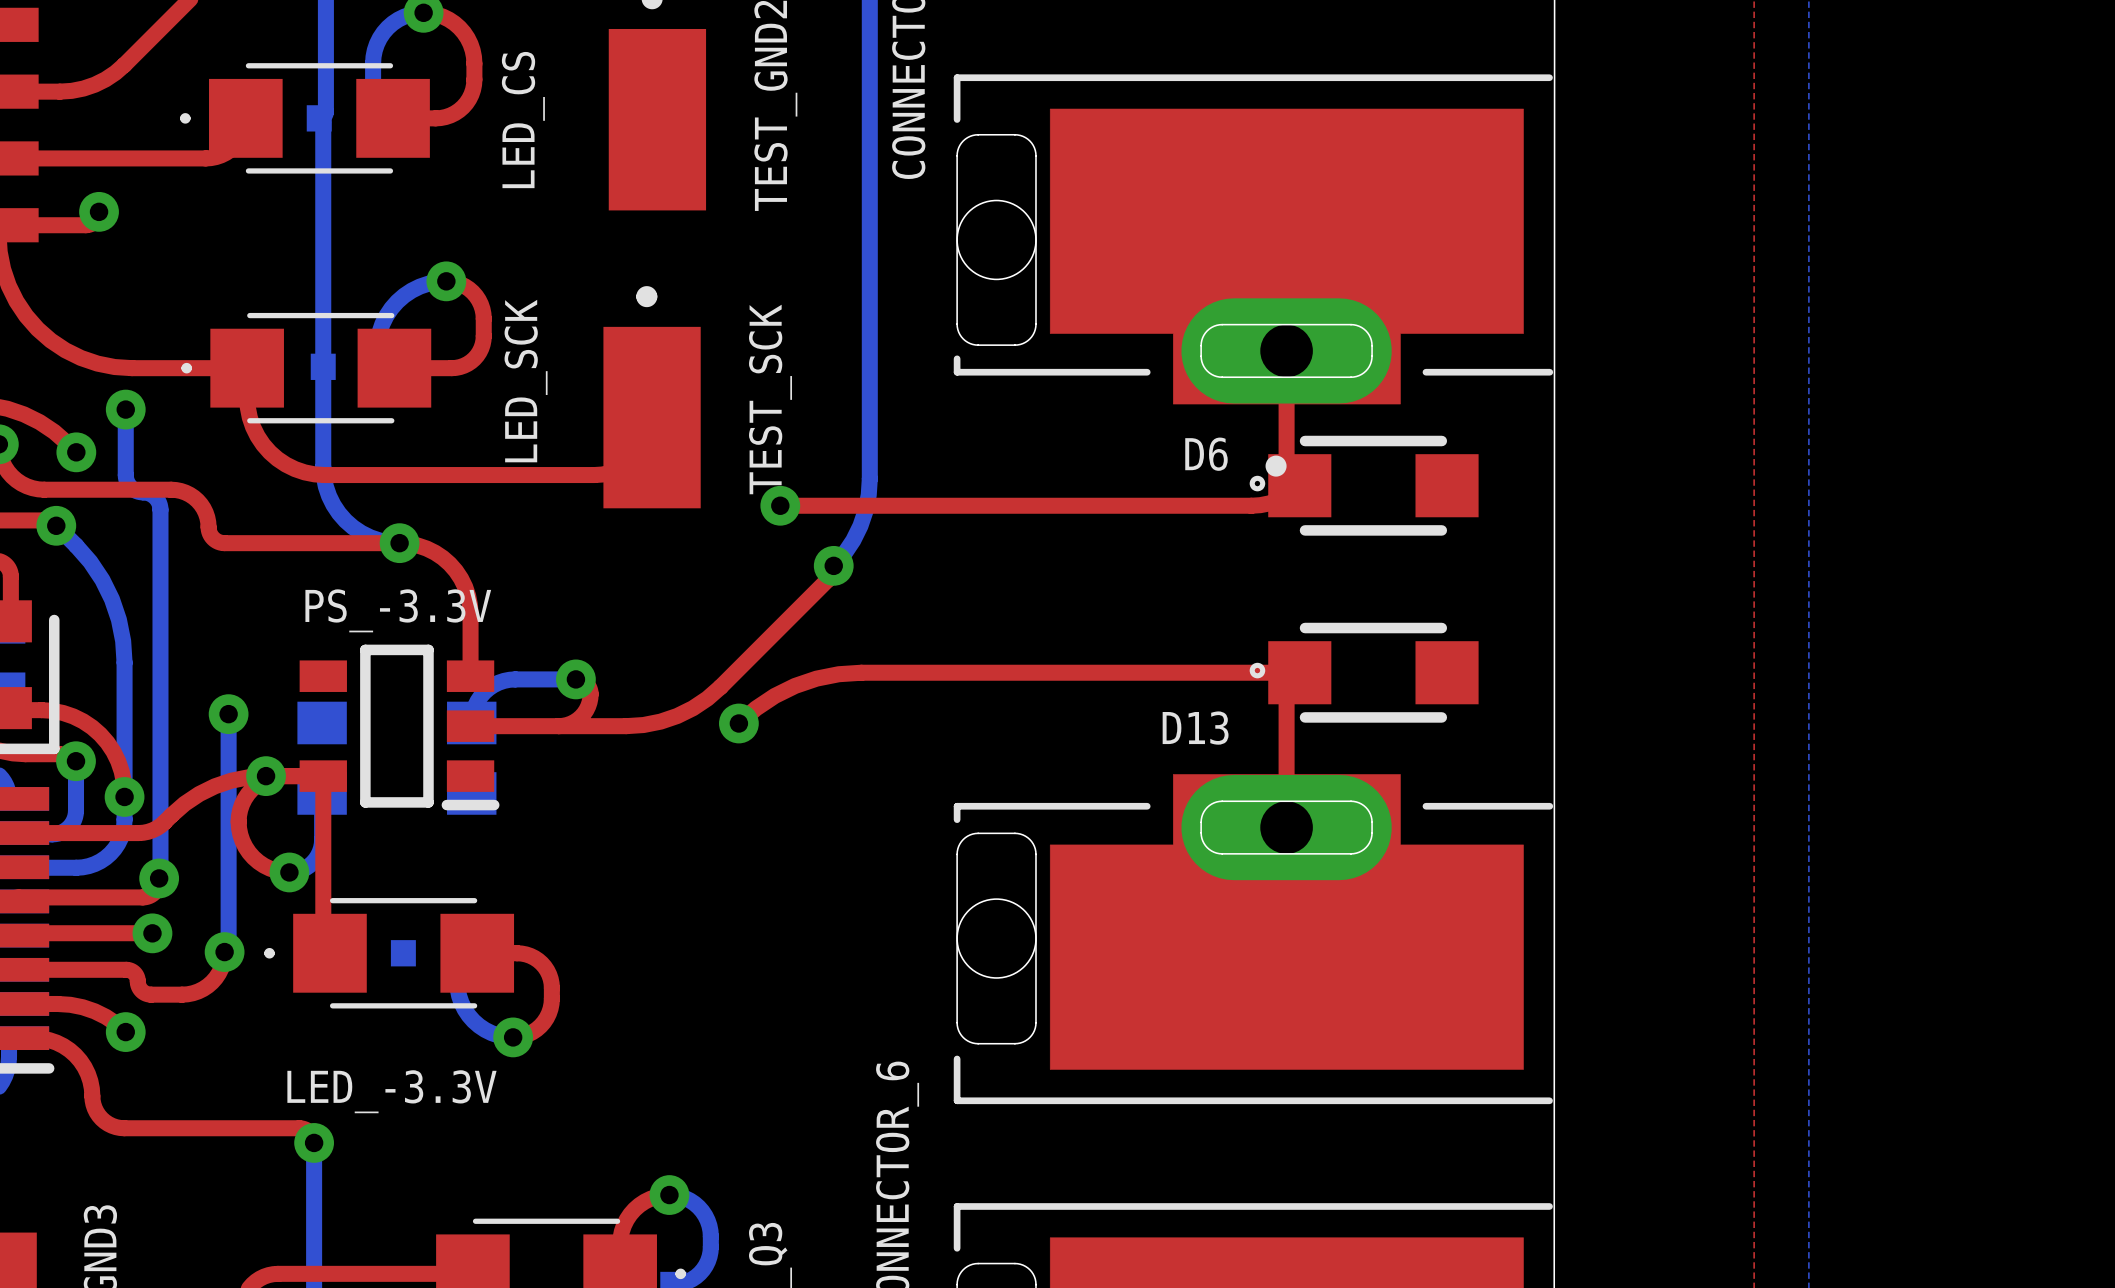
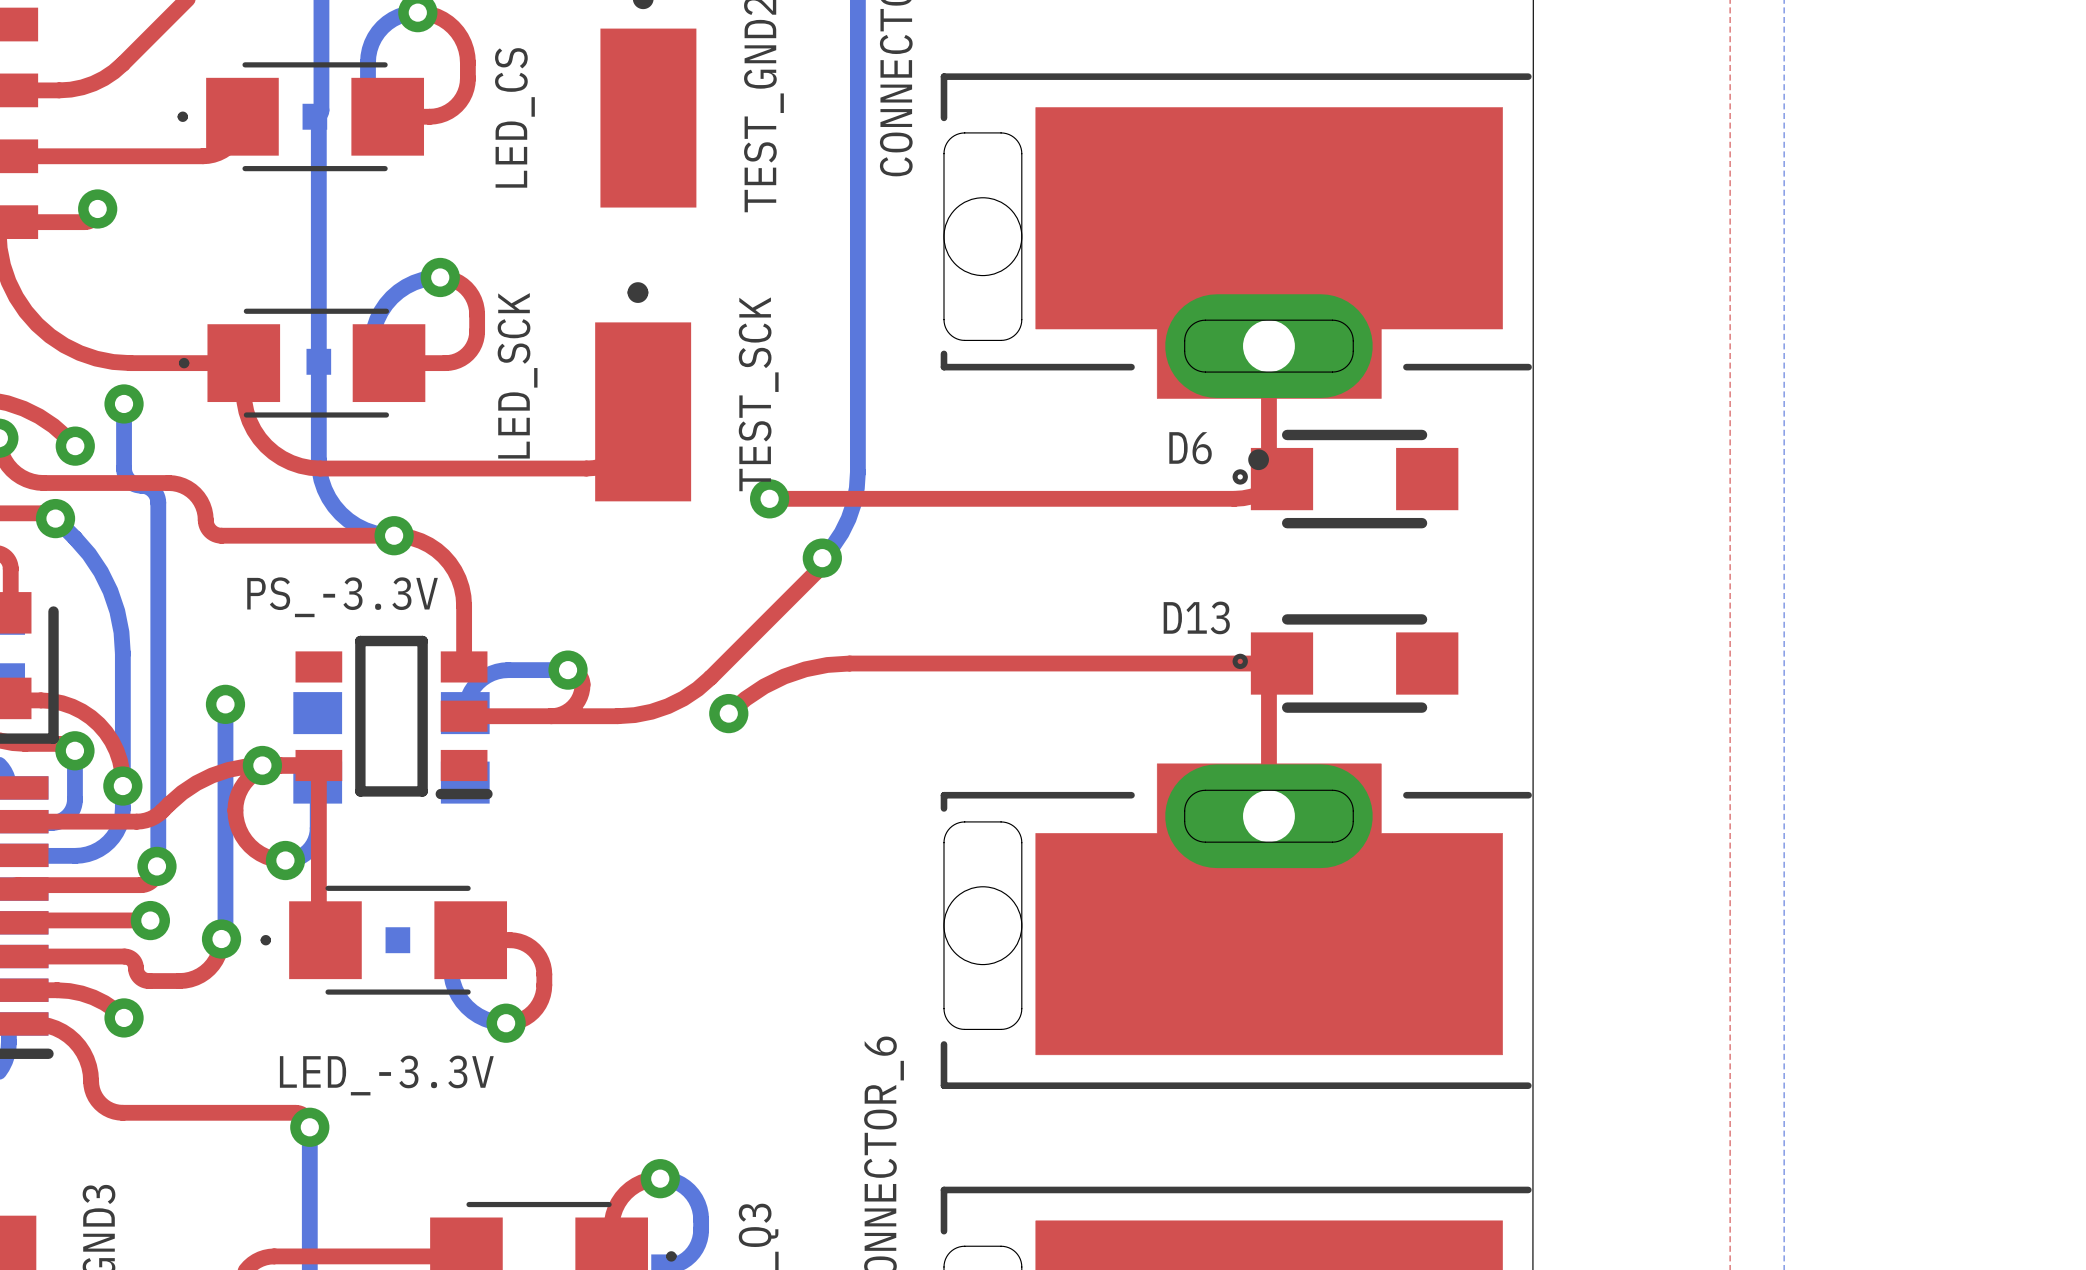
PS_-3.3V name position: PS_-3.3V (398, 610) -> PS_-3.3V (342, 597)
D13 name position: D13 (1195, 728) -> D13 (1196, 617)

